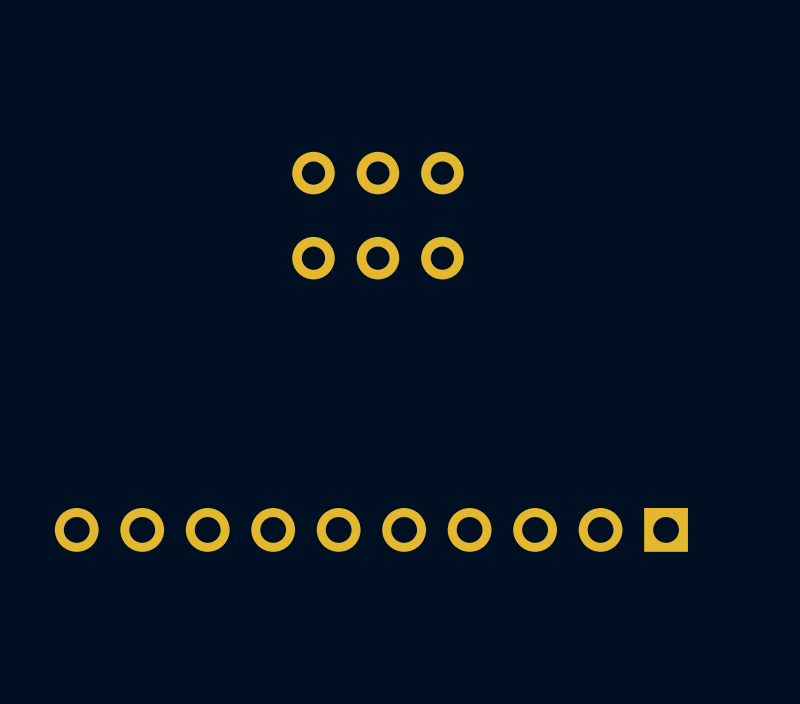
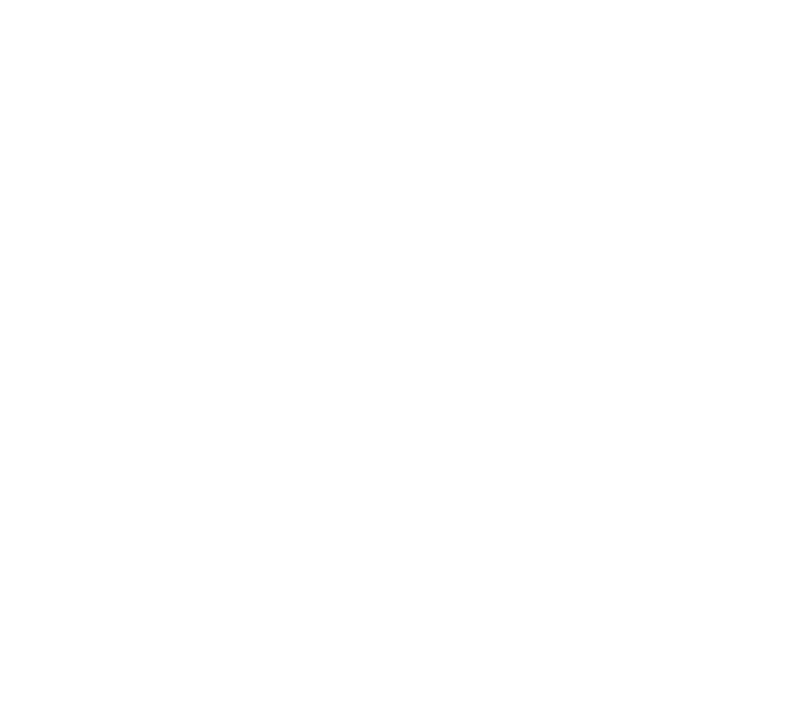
part: (377, 215) -> none
part: (371, 529) -> none

